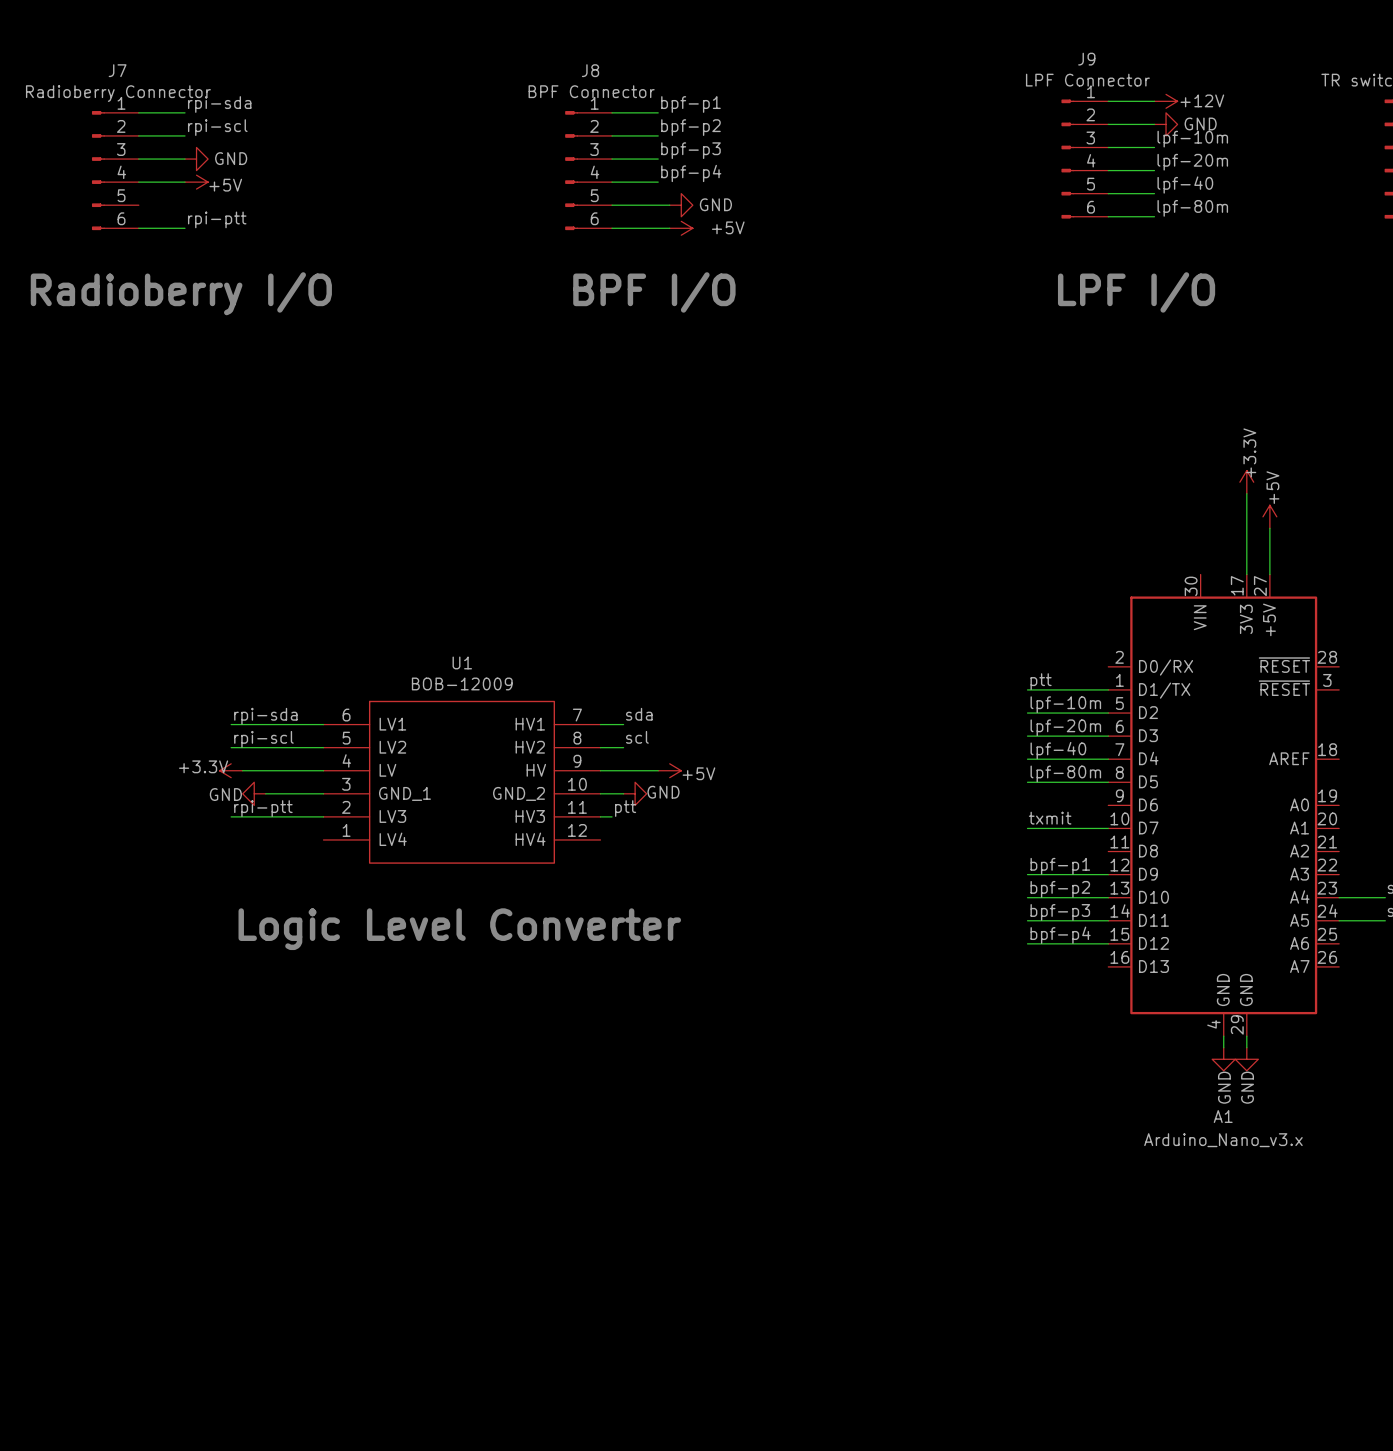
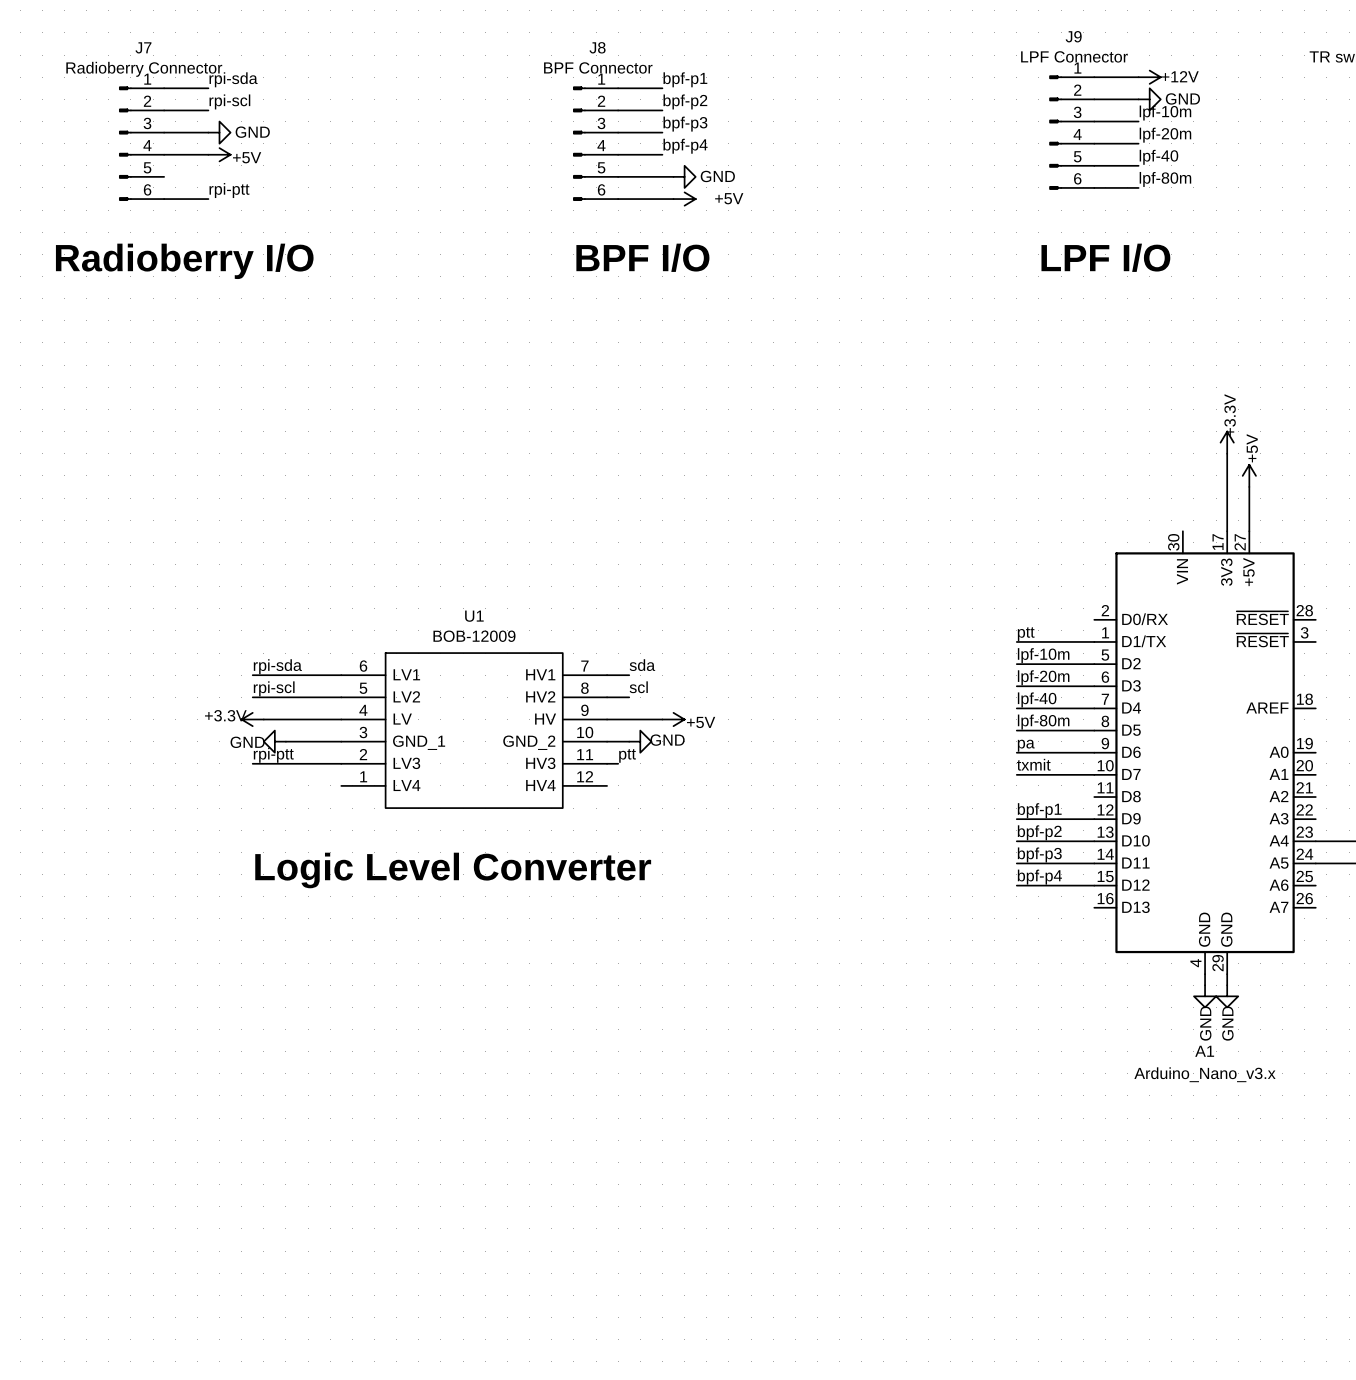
label: none -> pa (1026, 745)
wire: none -> (1016, 752) (1094, 752)

